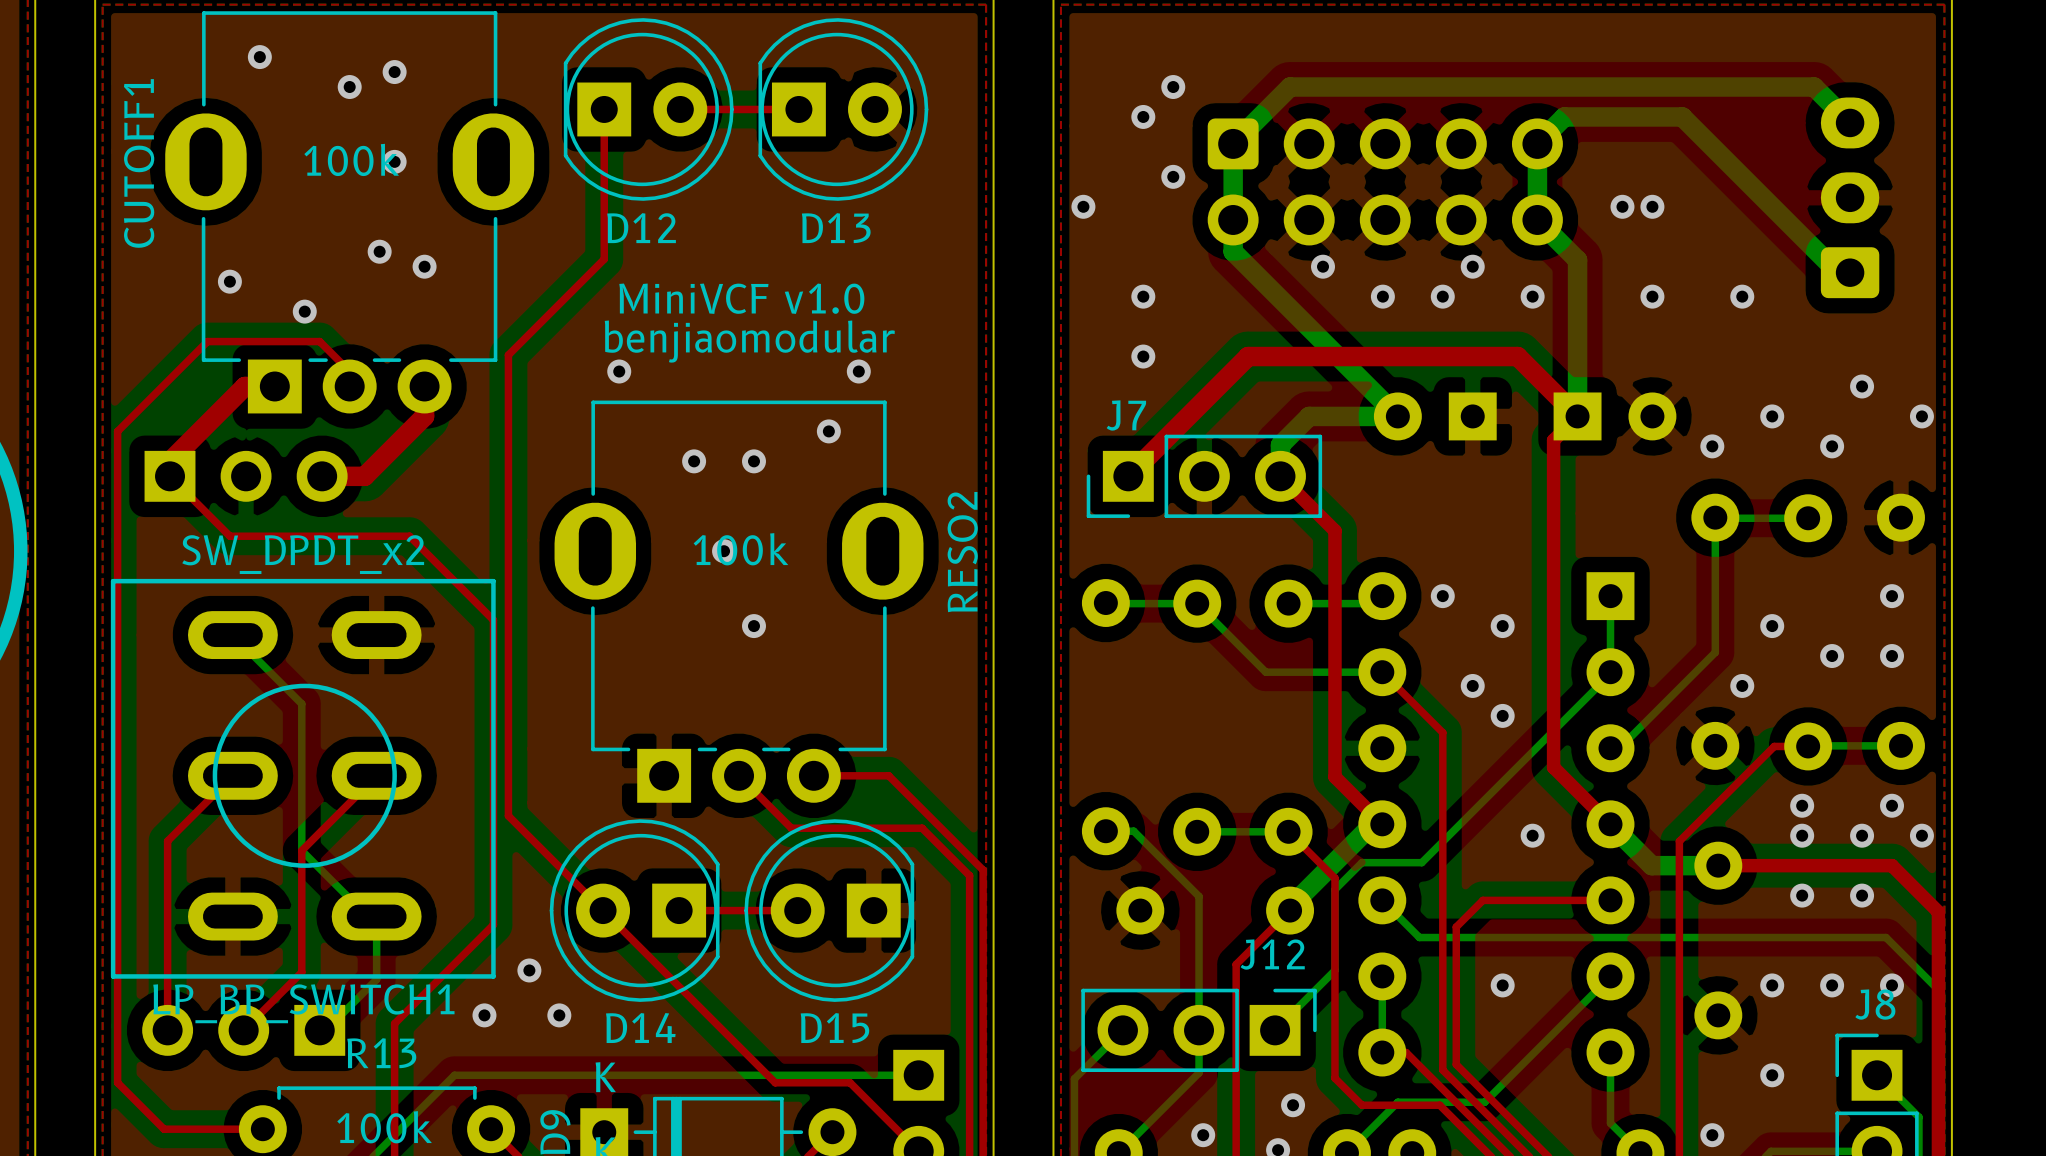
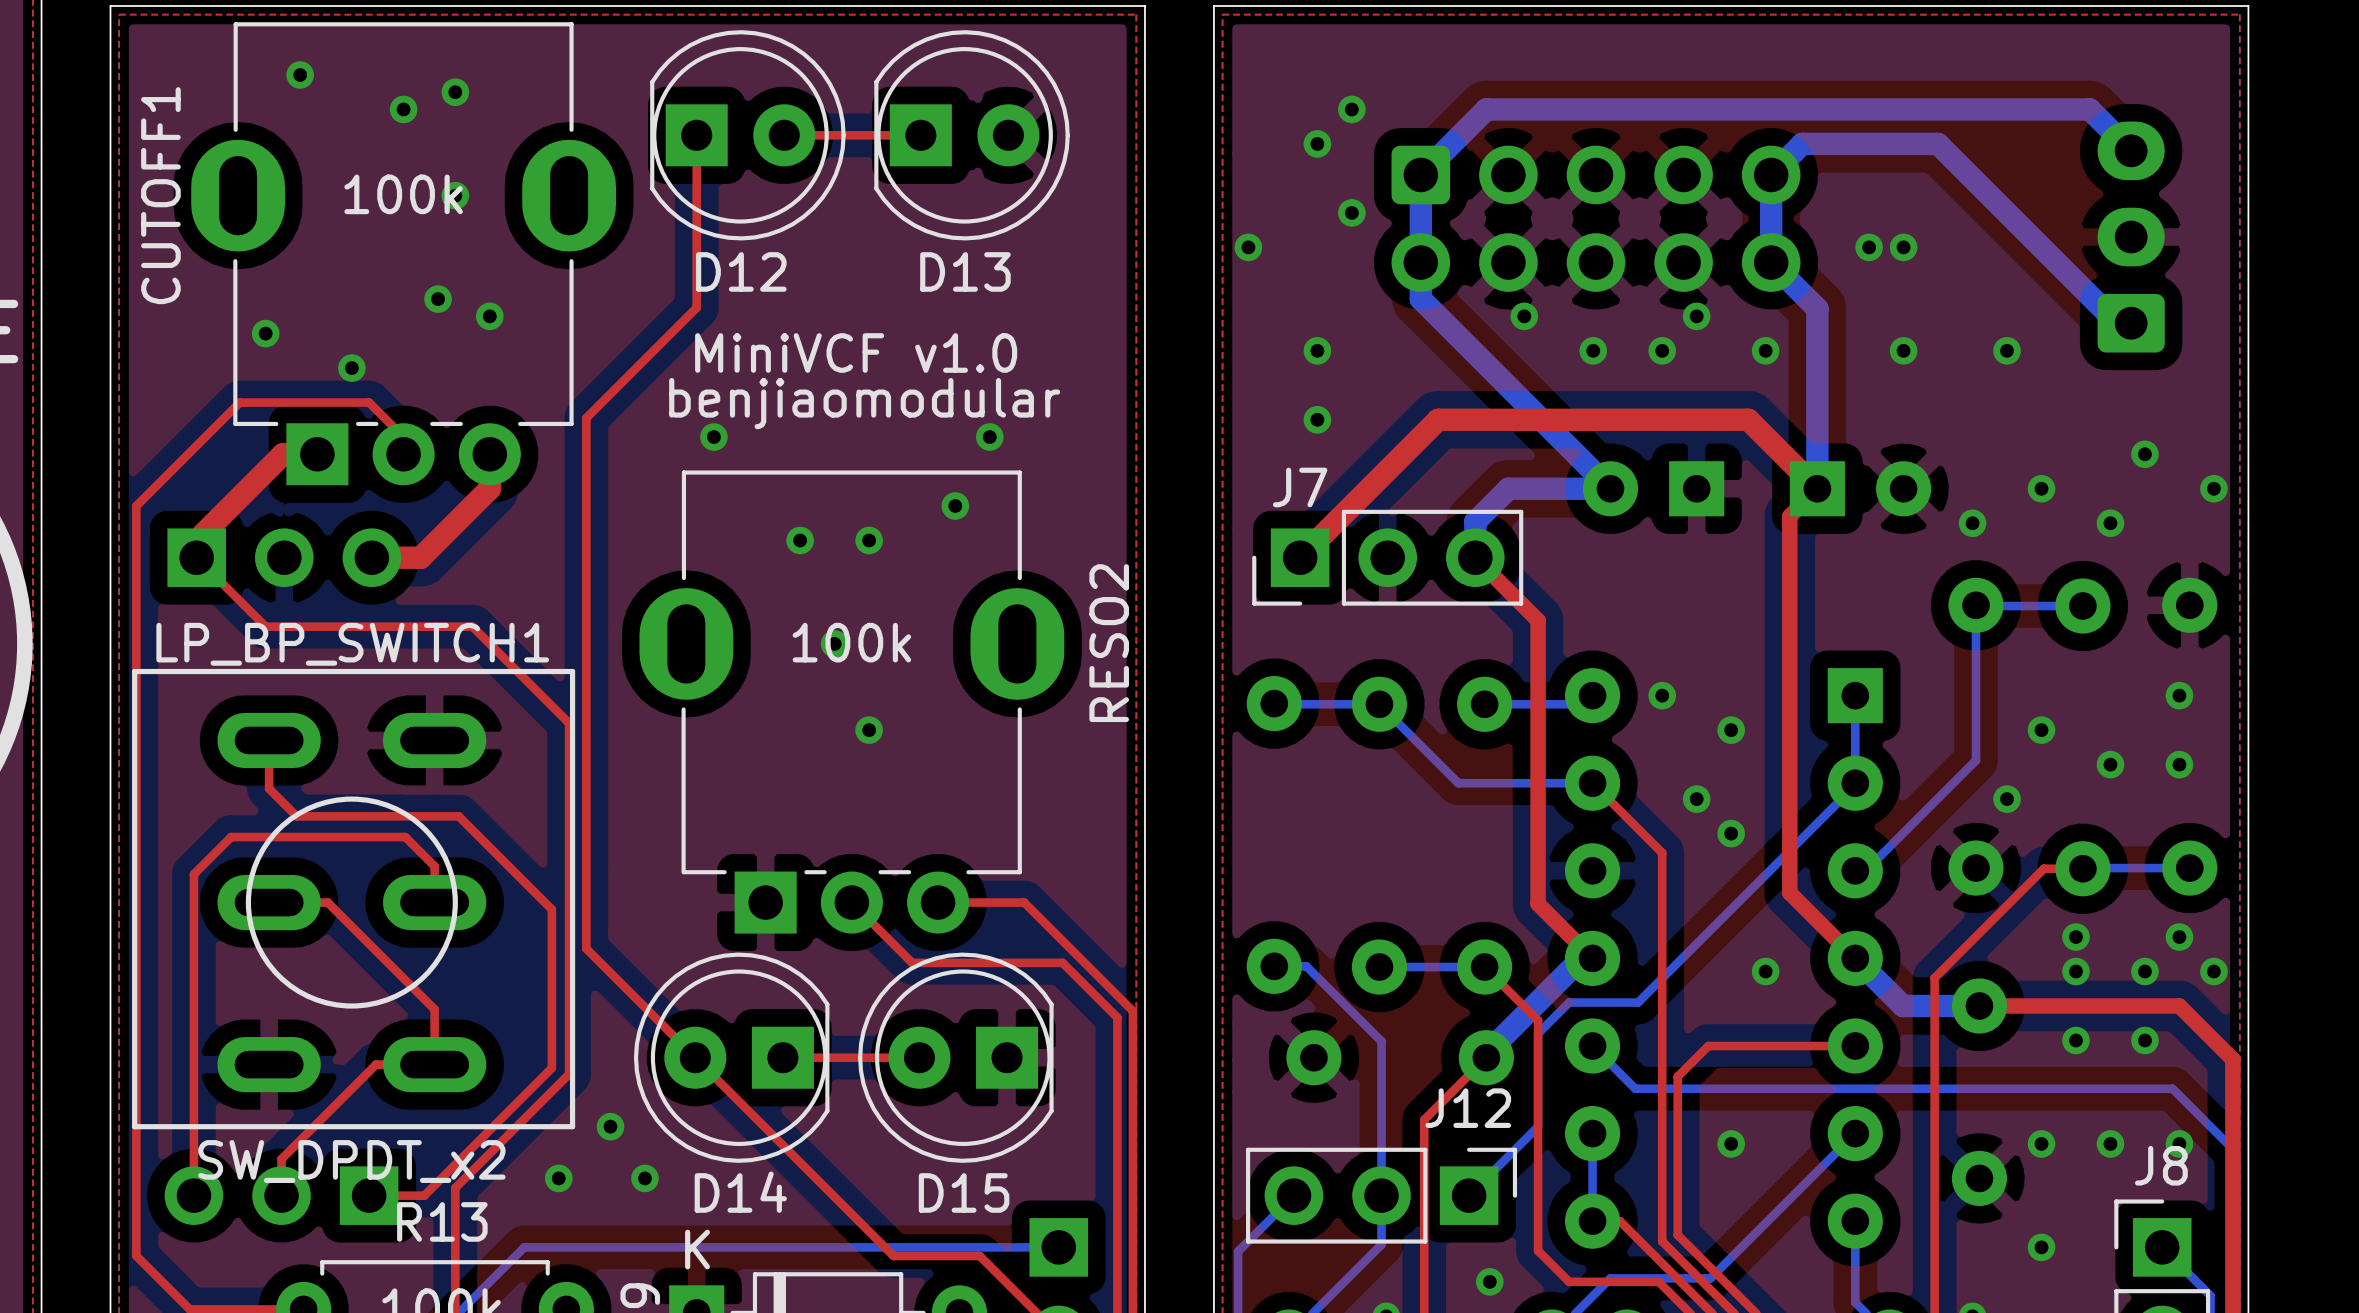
top track: none -> (269, 740) (269, 788) (296, 816) (458, 816) (551, 909) (551, 1068) (424, 1195) (369, 1195)
bottom track: (232, 635) (301, 703) (301, 850) (367, 916) (376, 916) (376, 979) (325, 1030) (319, 1030) -> none
top track: (232, 775) (167, 841) -> (434, 902) (434, 866) (405, 837) (231, 837) (193, 874) (193, 977)
top track: (376, 775) (301, 850) (301, 972) (243, 1030) -> (269, 902) (327, 902) (434, 1009) (434, 1064) (376, 1064) (281, 1159) (281, 1195)
LP_BP_SWITCH1 rotation: 0° (303, 778) -> 180° (353, 899)

